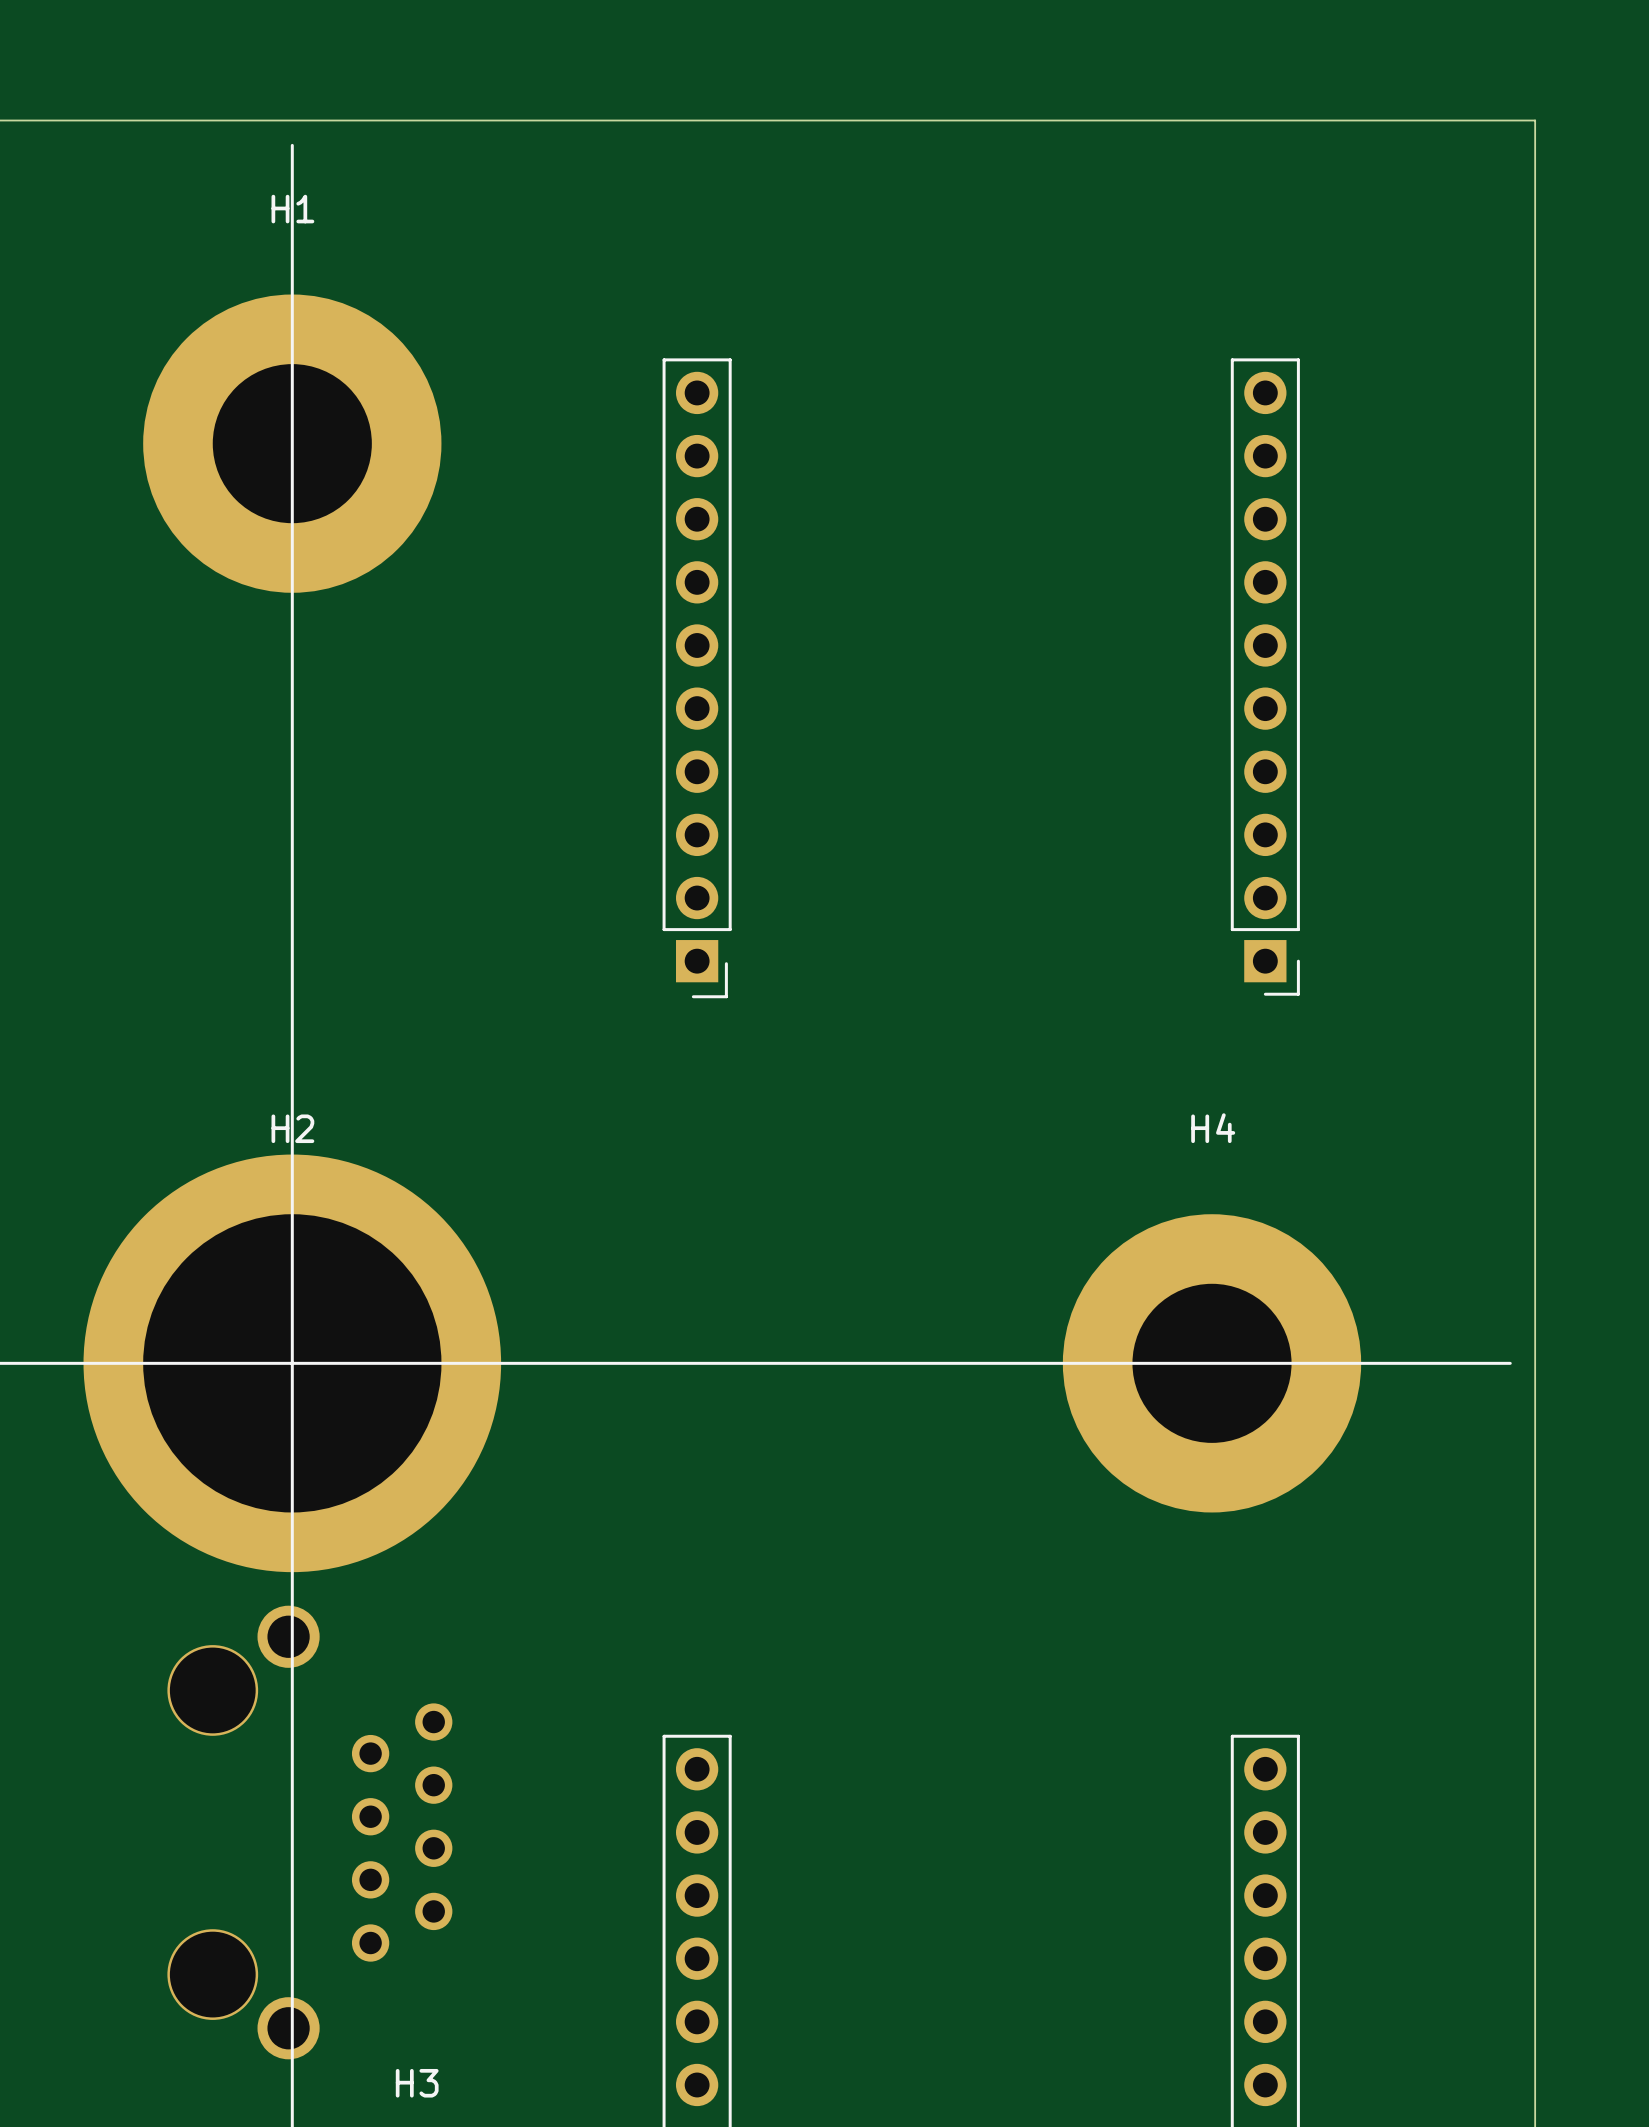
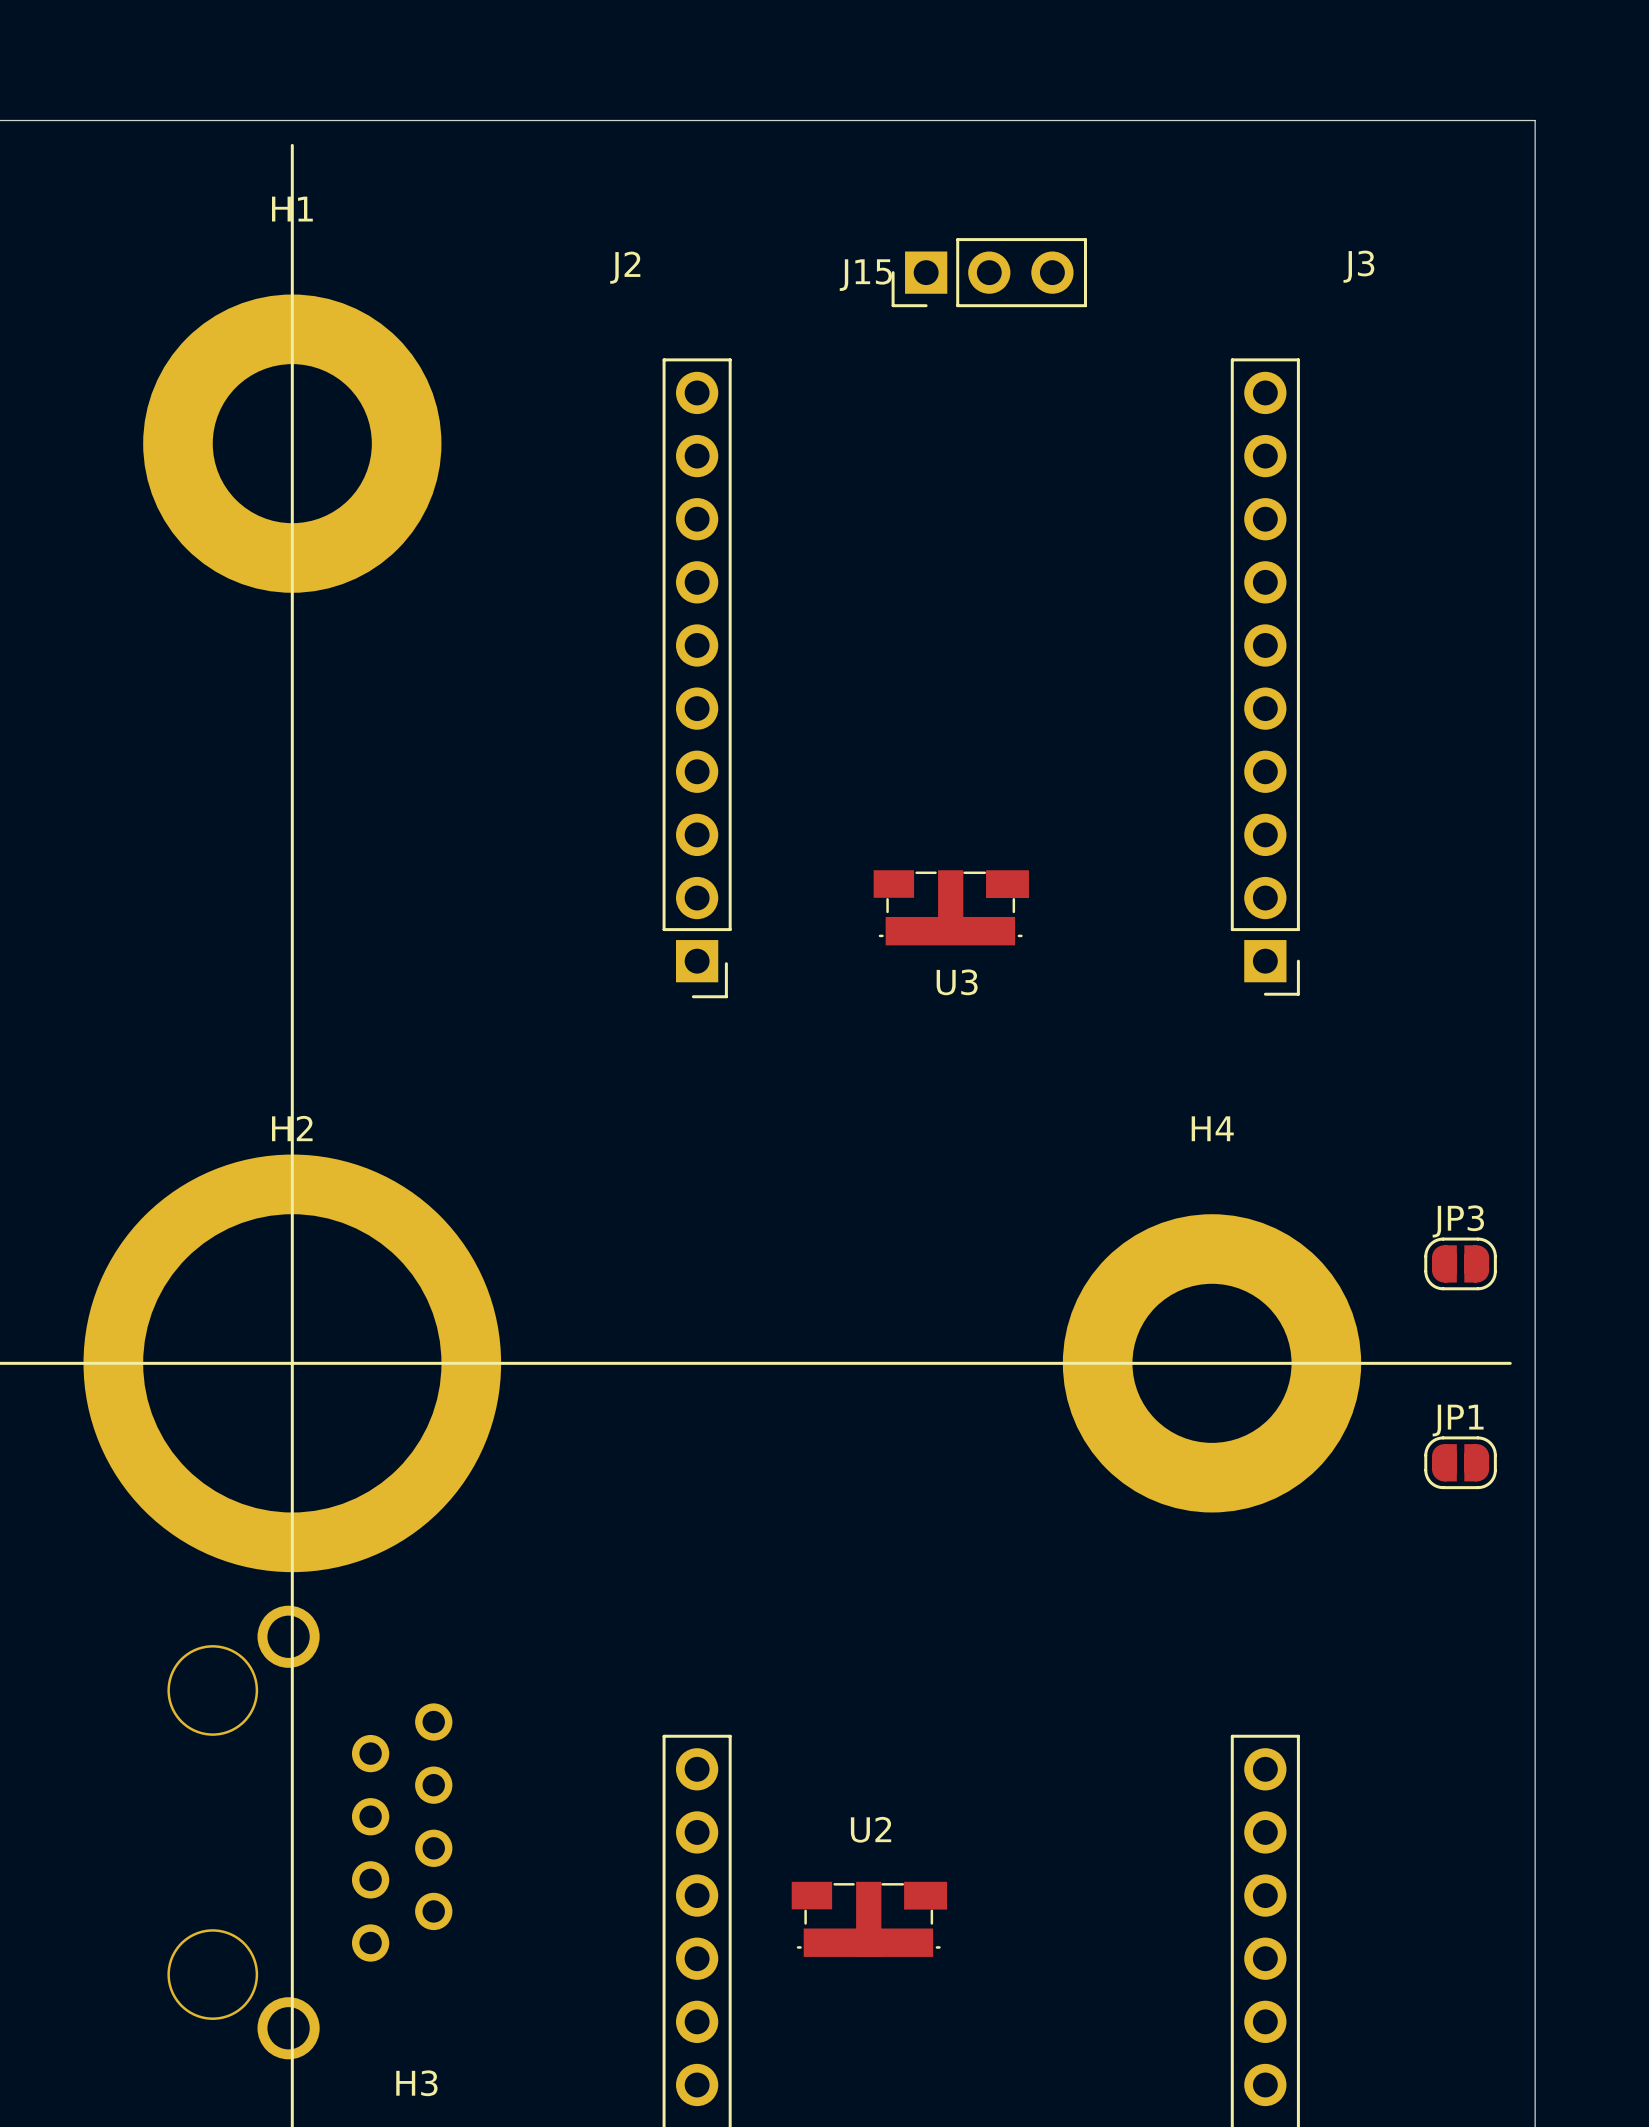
J3: none -> (1358, 266)
J2: none -> (625, 267)
J15: none -> (989, 272)
U3: none -> (951, 907)
JP3: none -> (1460, 1263)
JP1: none -> (1460, 1462)
U2: none -> (869, 1919)

